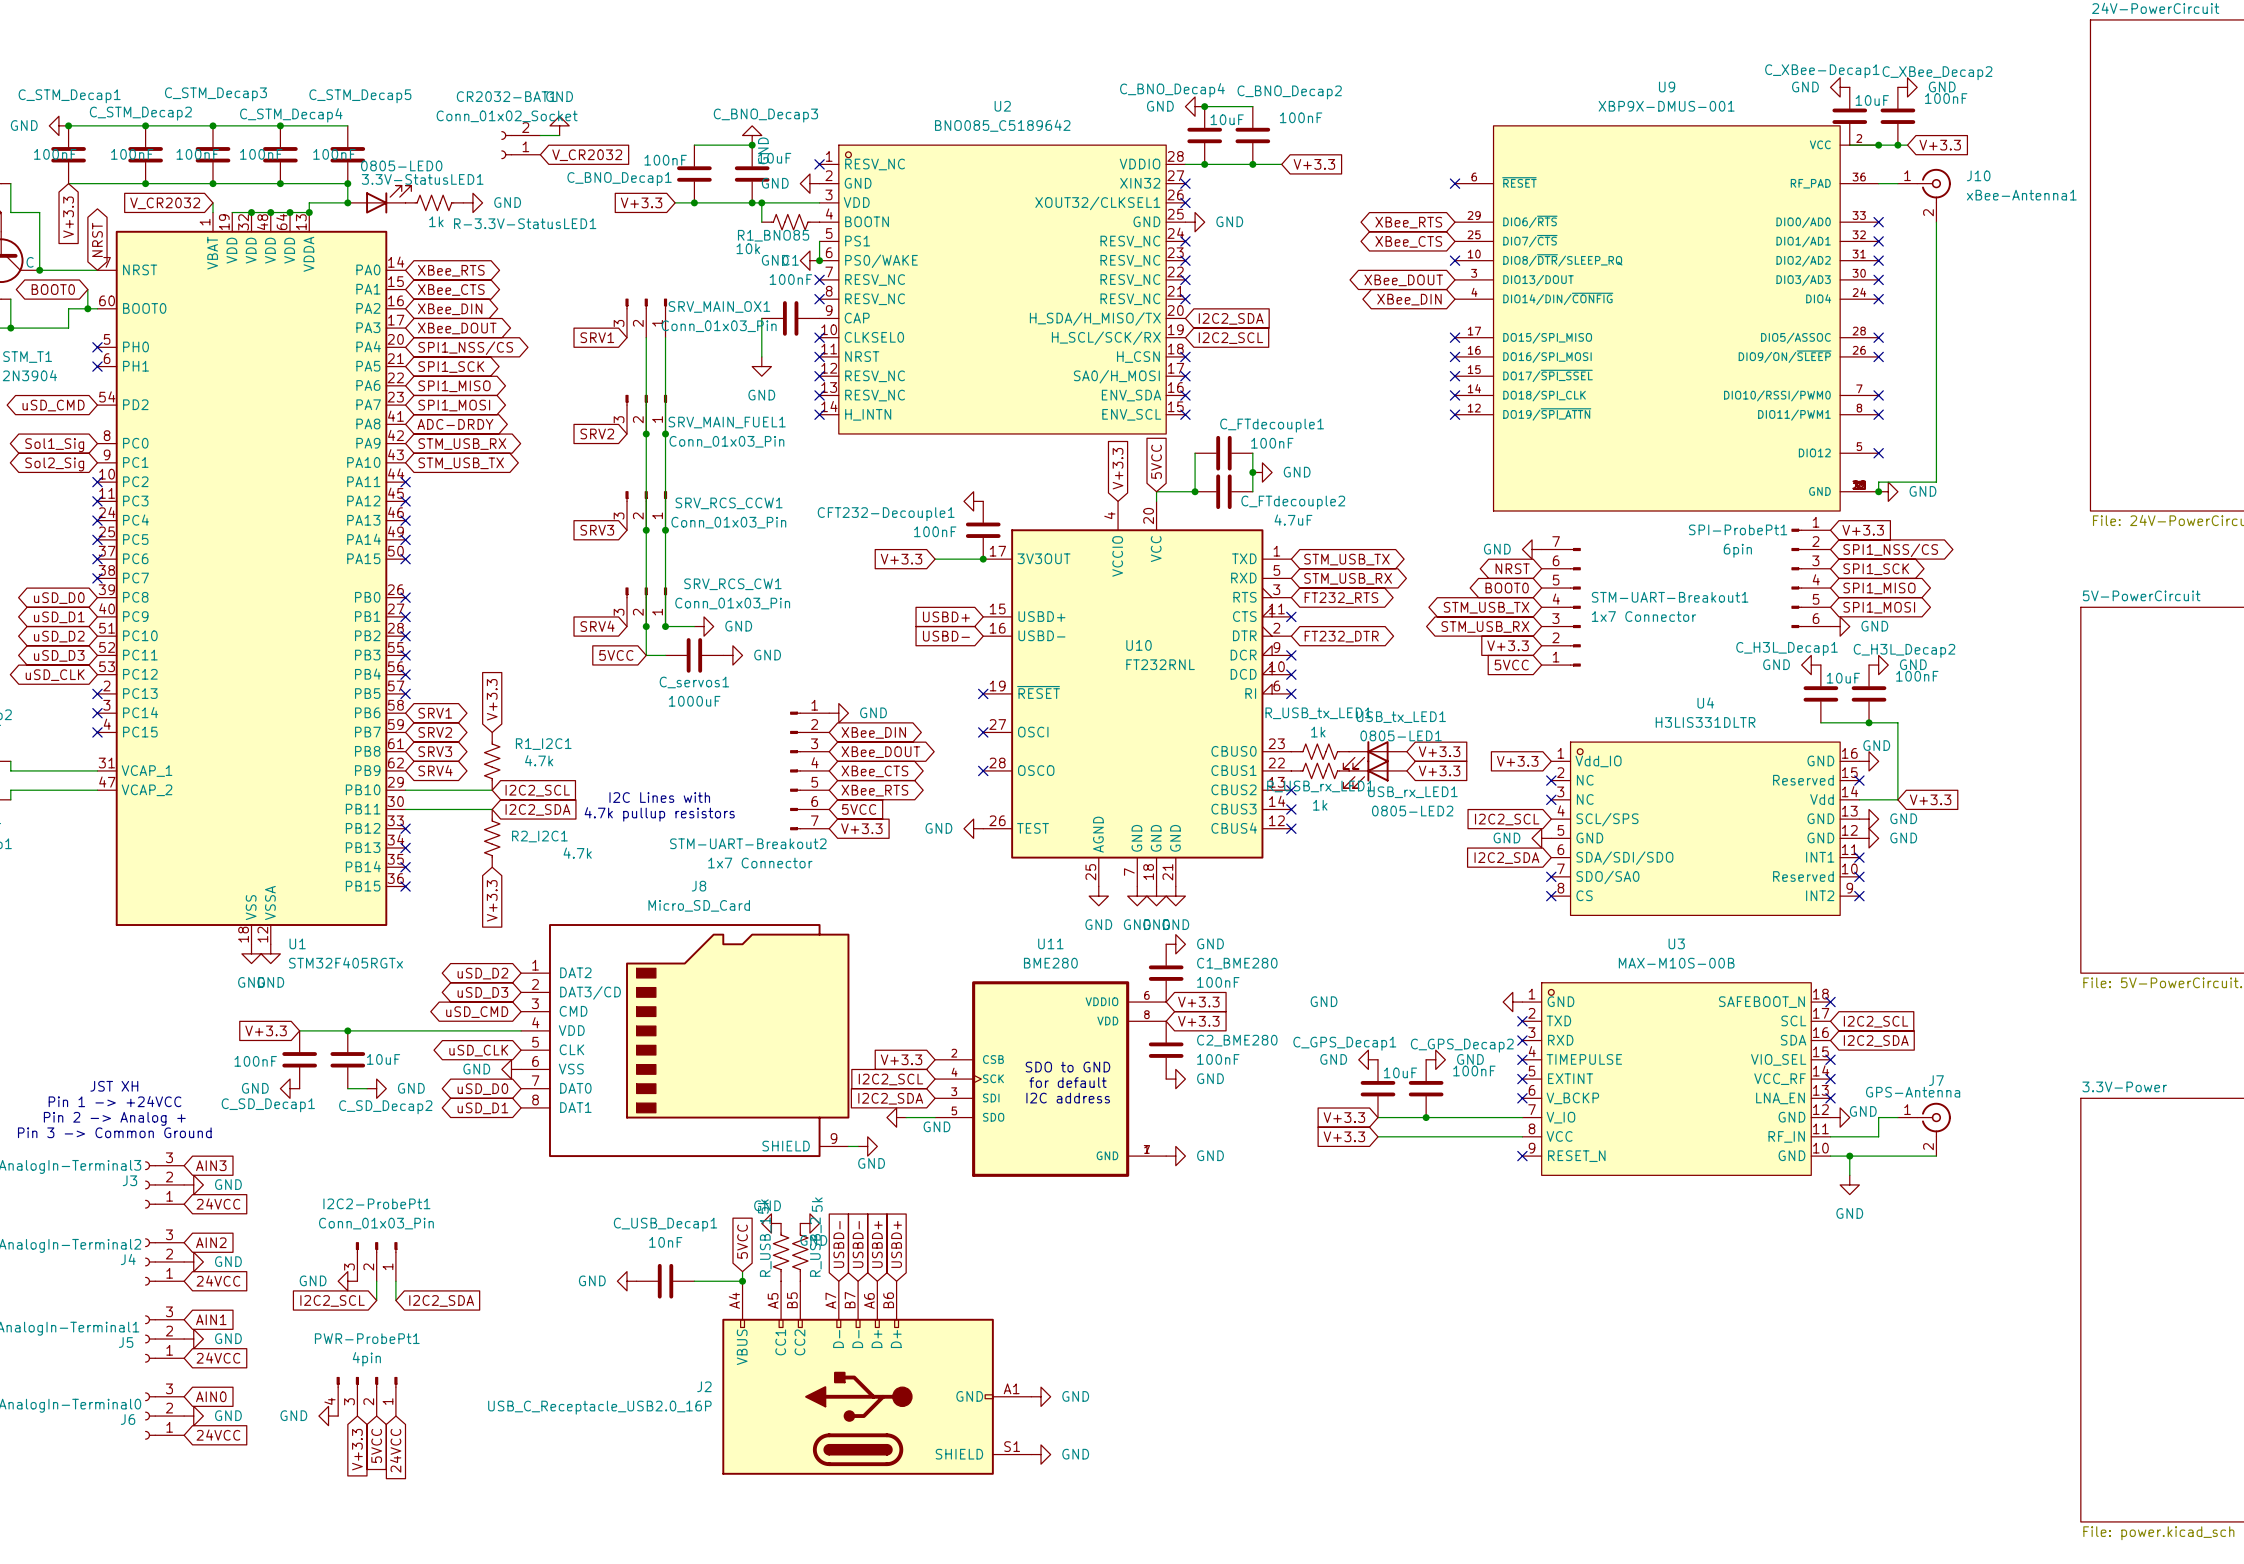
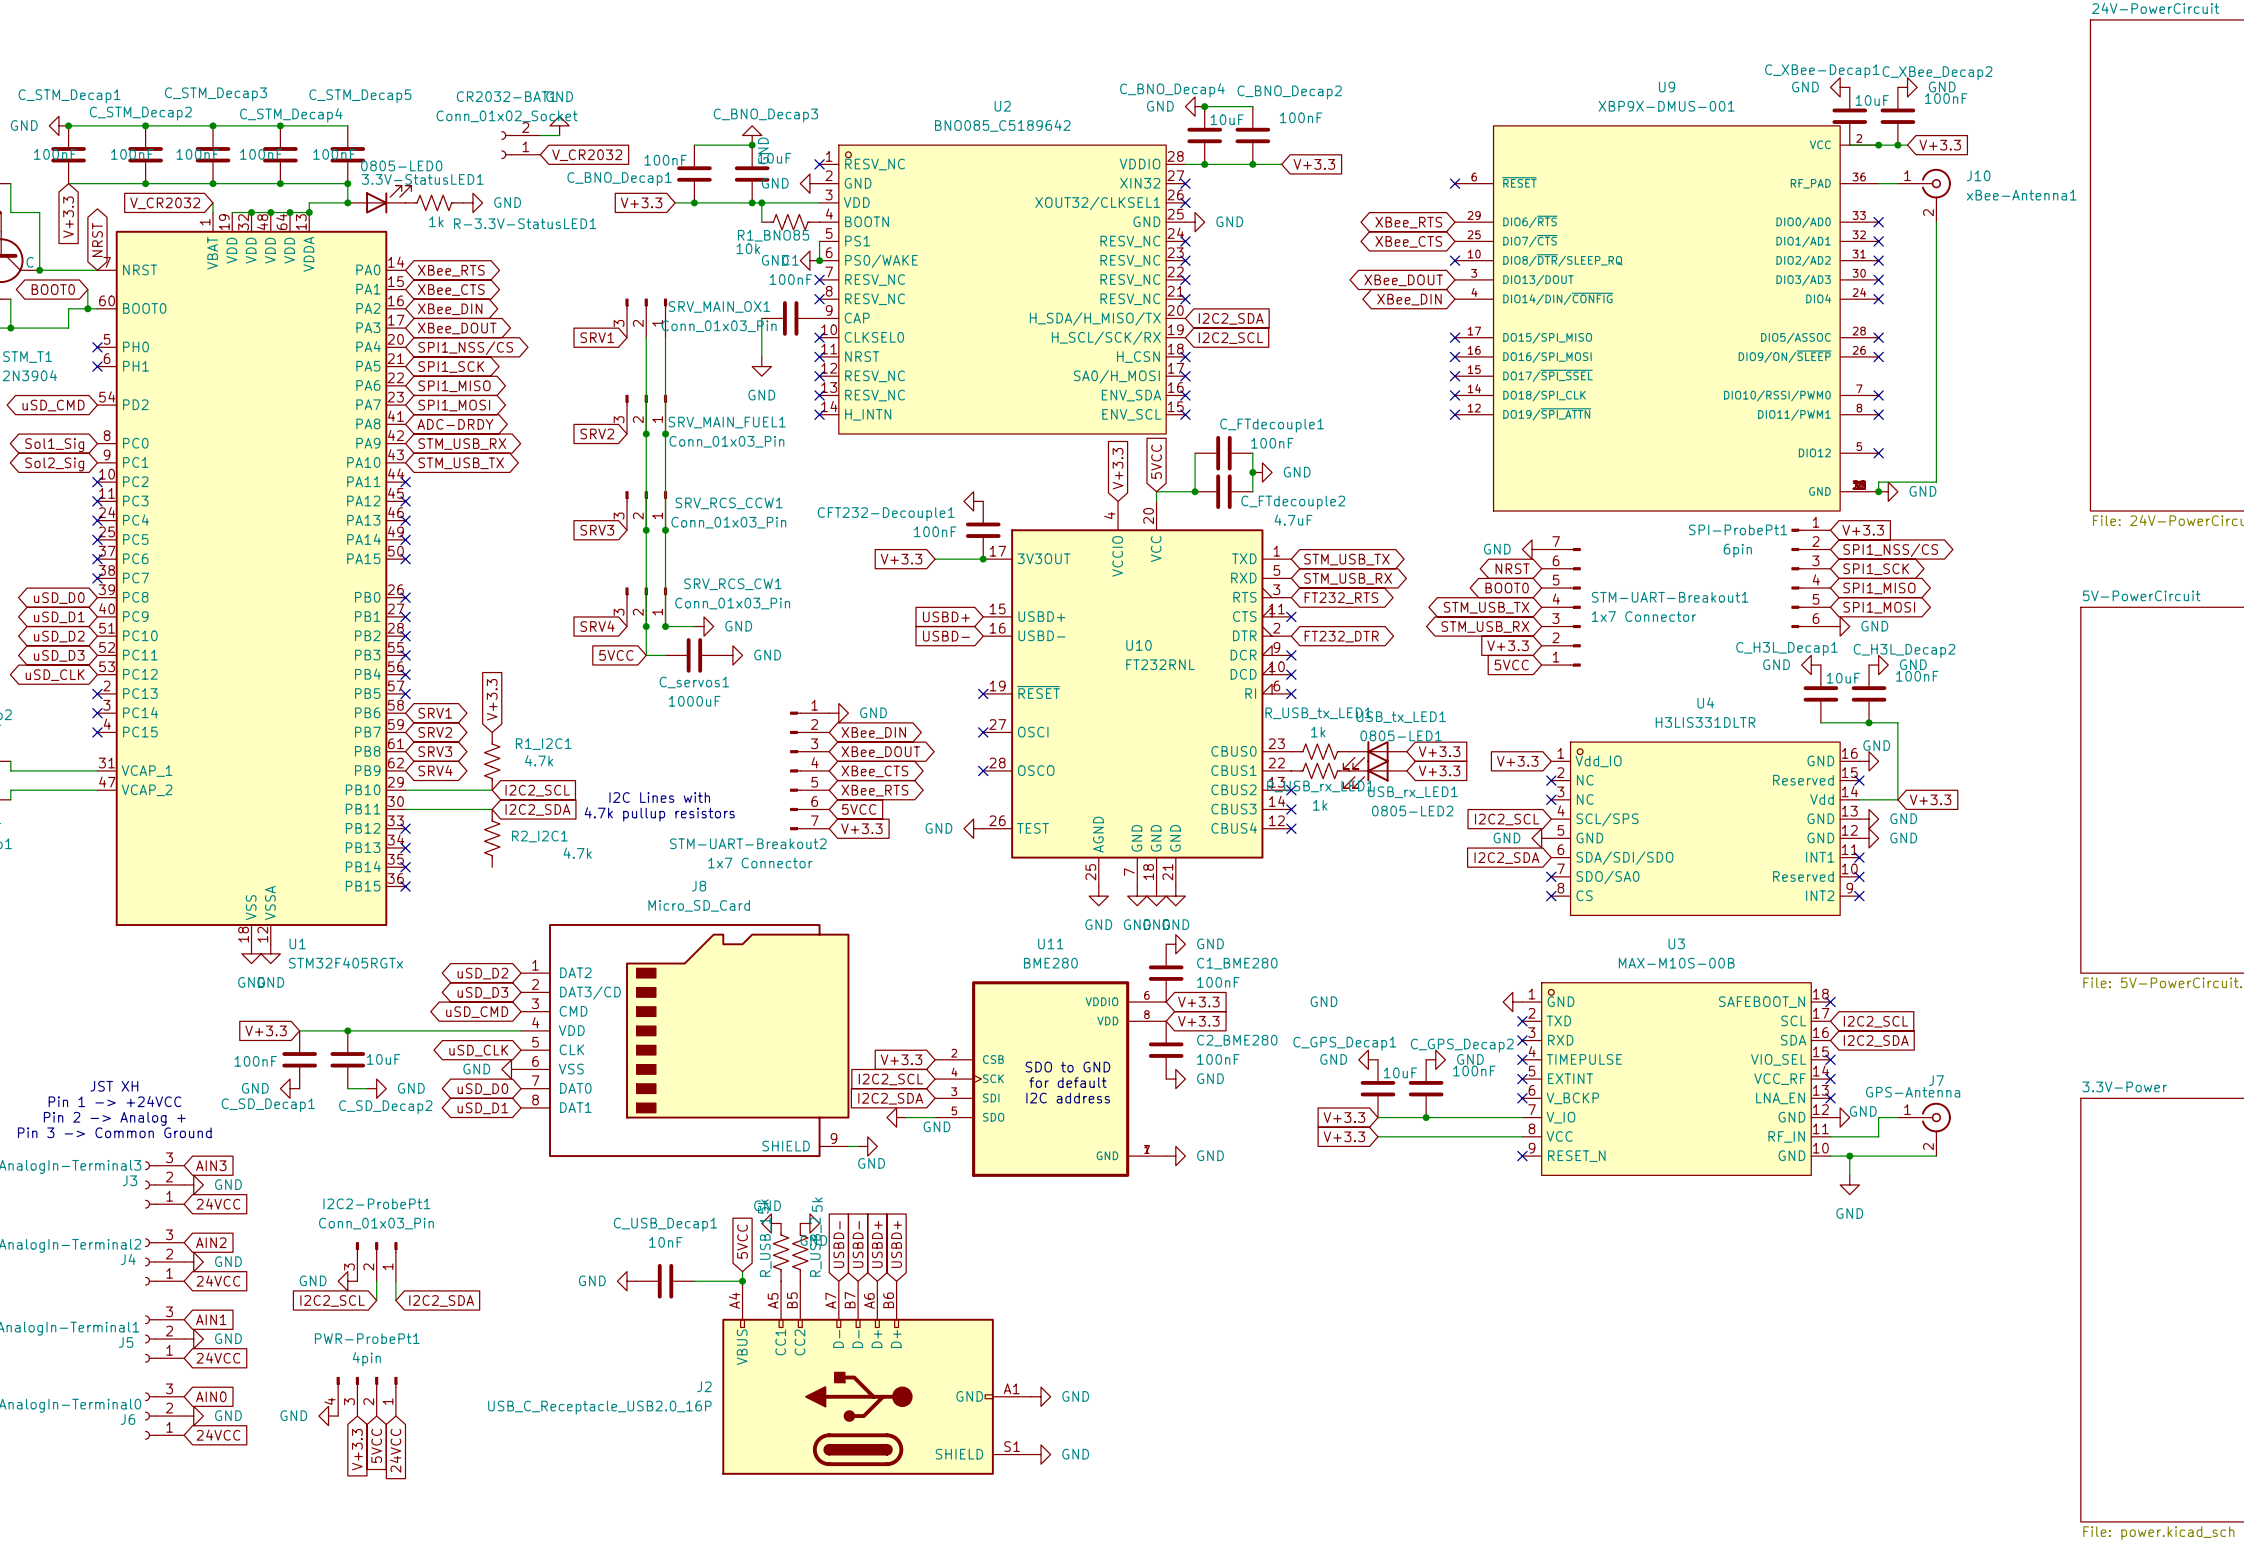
global label: V+3.3 (492, 900) -> none

